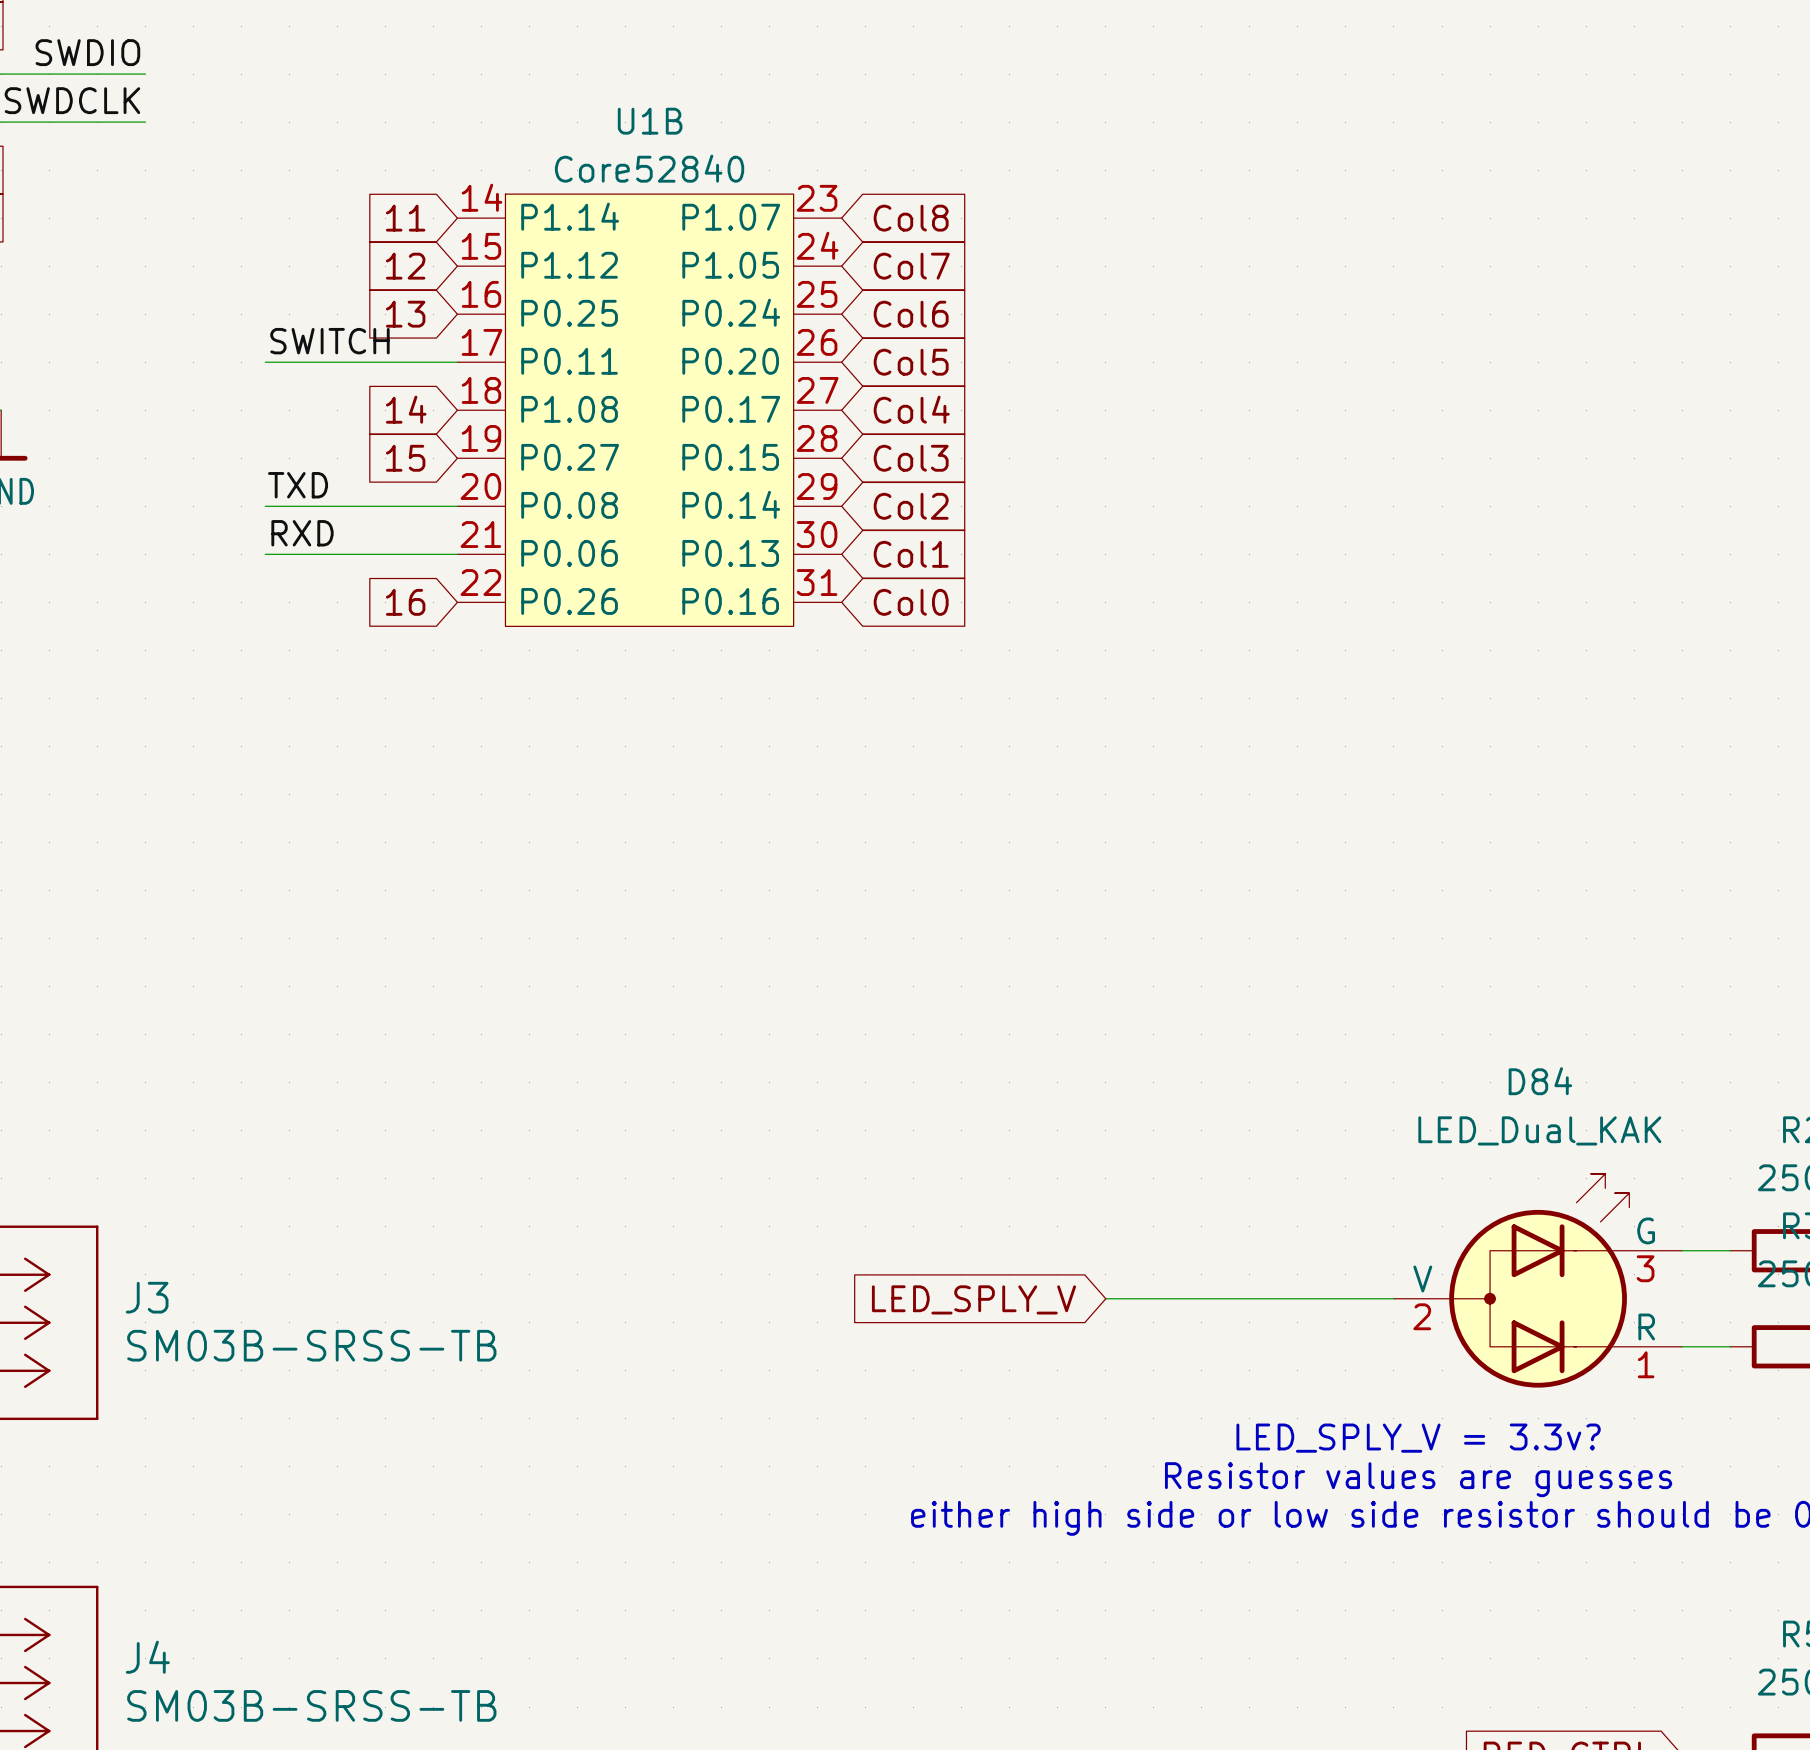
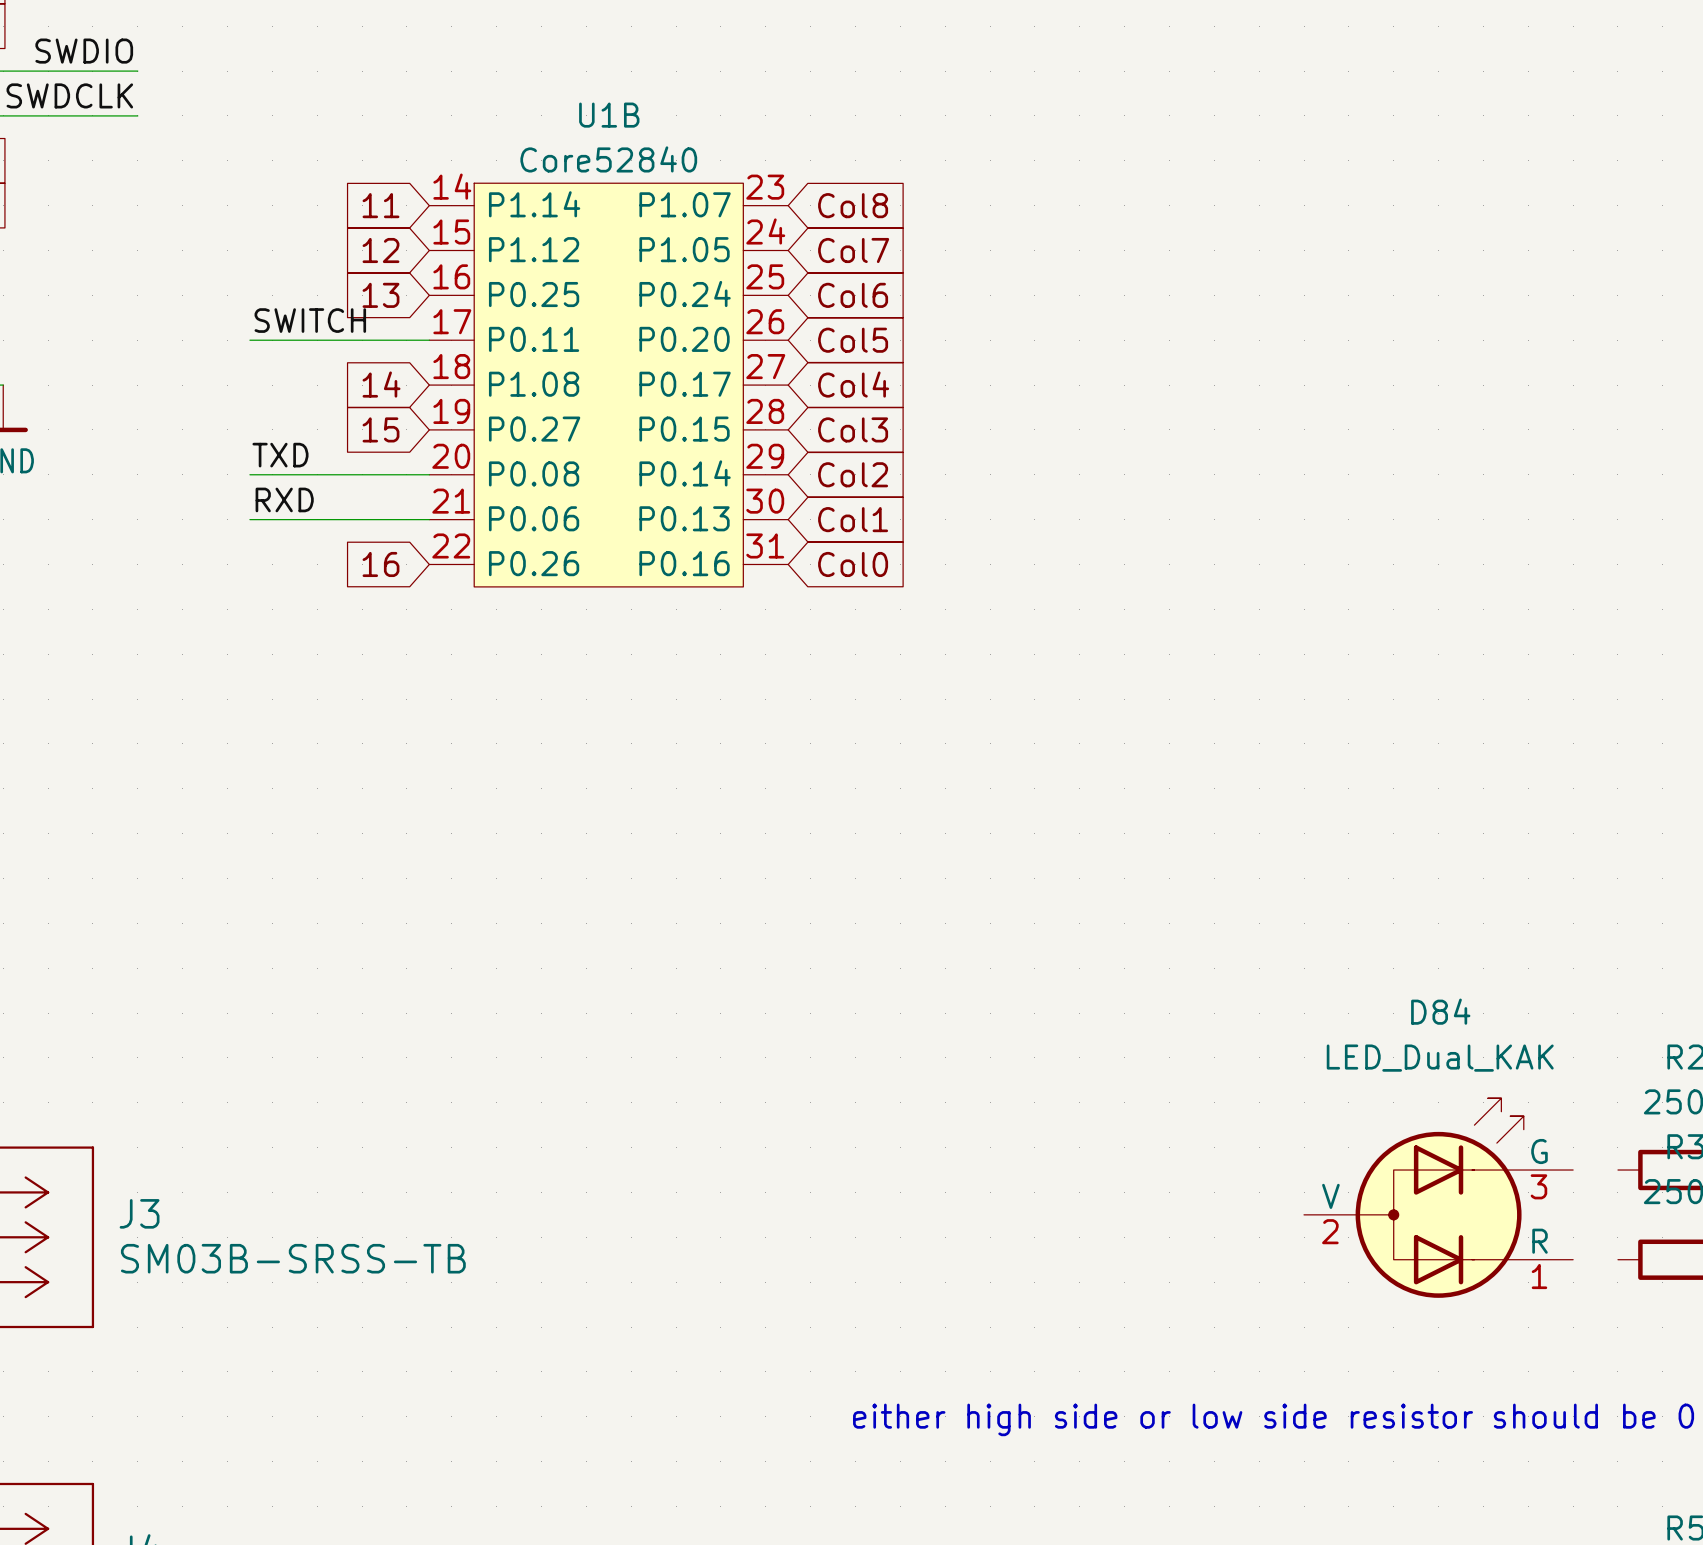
wire: (1682, 1250) (1730, 1250) -> none
wire: (1105, 1298) (1393, 1298) -> none
global label: LED_SPLY_V (973, 1299) -> none
wire: (1682, 1346) (1730, 1346) -> none
text: LED_SPLY_V = 3.3v? (1418, 1438) -> none
text: Resistor values are guesses (1418, 1479) -> none

